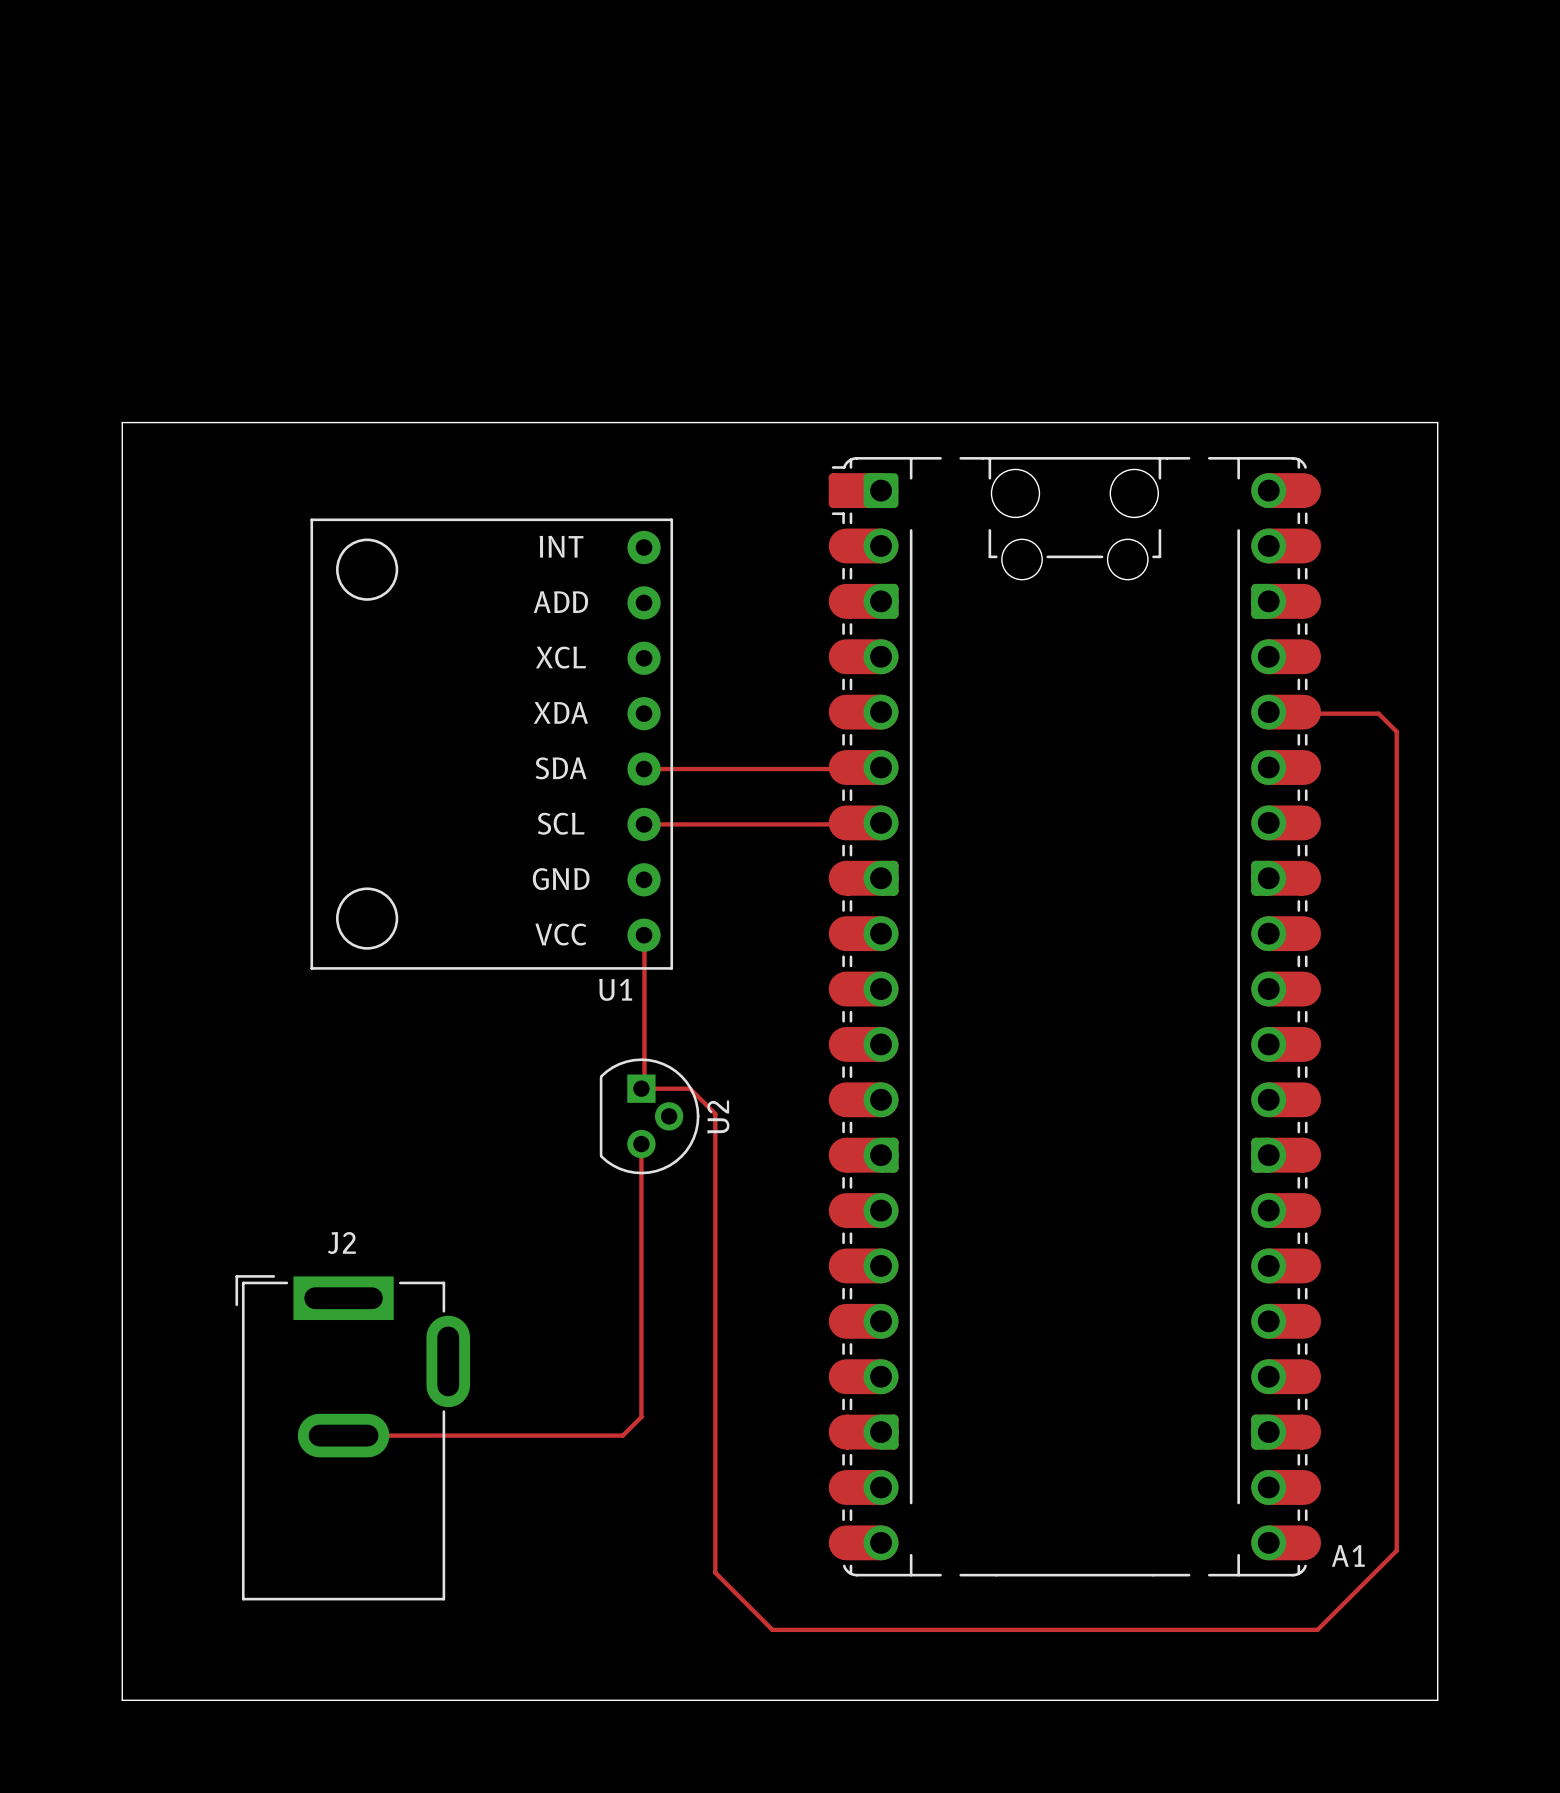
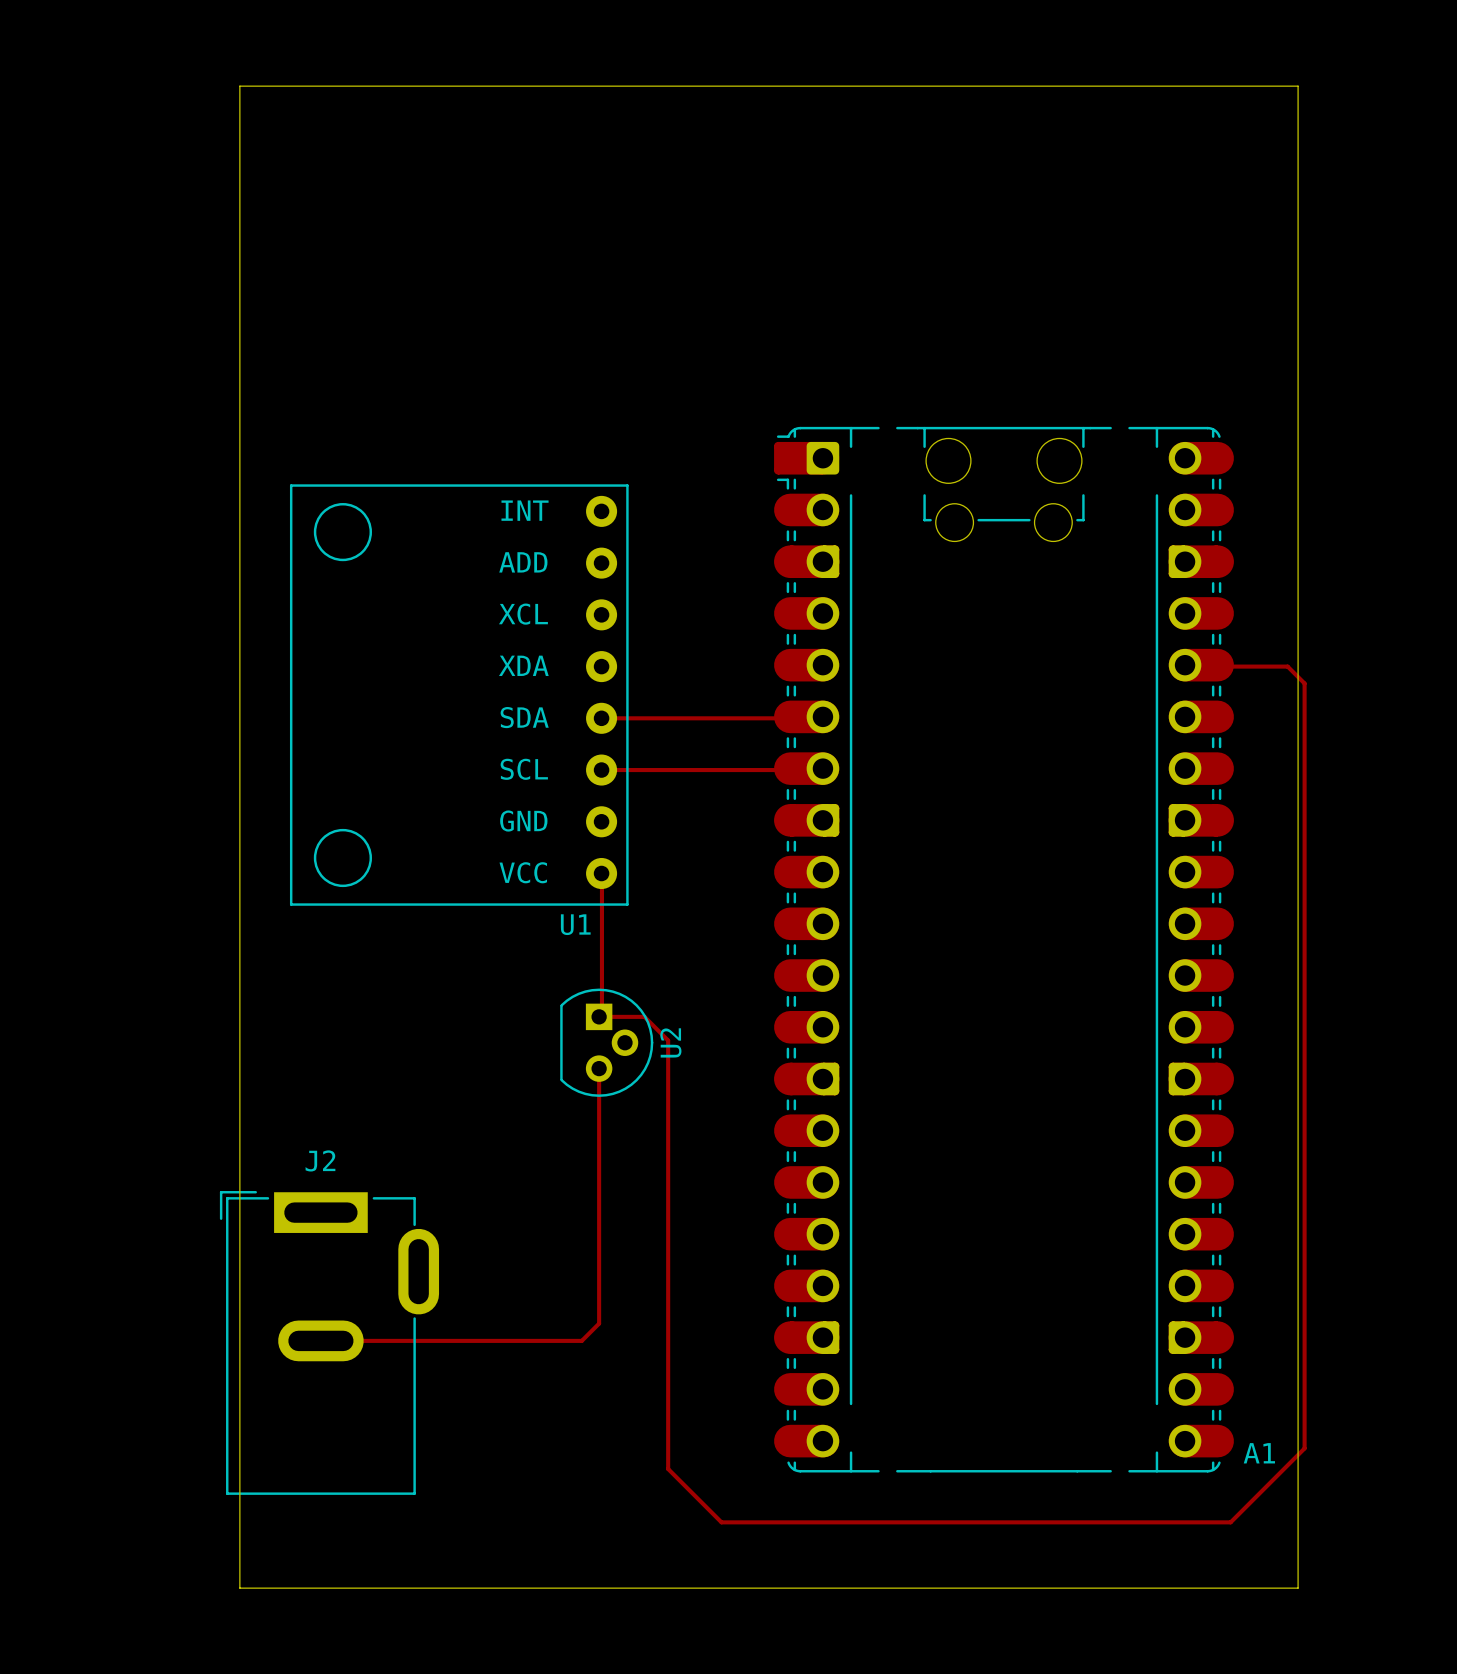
board edge: (256, 1700) (122, 1700) (122, 422) (1437, 422) (1437, 1700) (1389, 1700) -> (239, 1588) (239, 86) (1298, 86) (1298, 1588)

